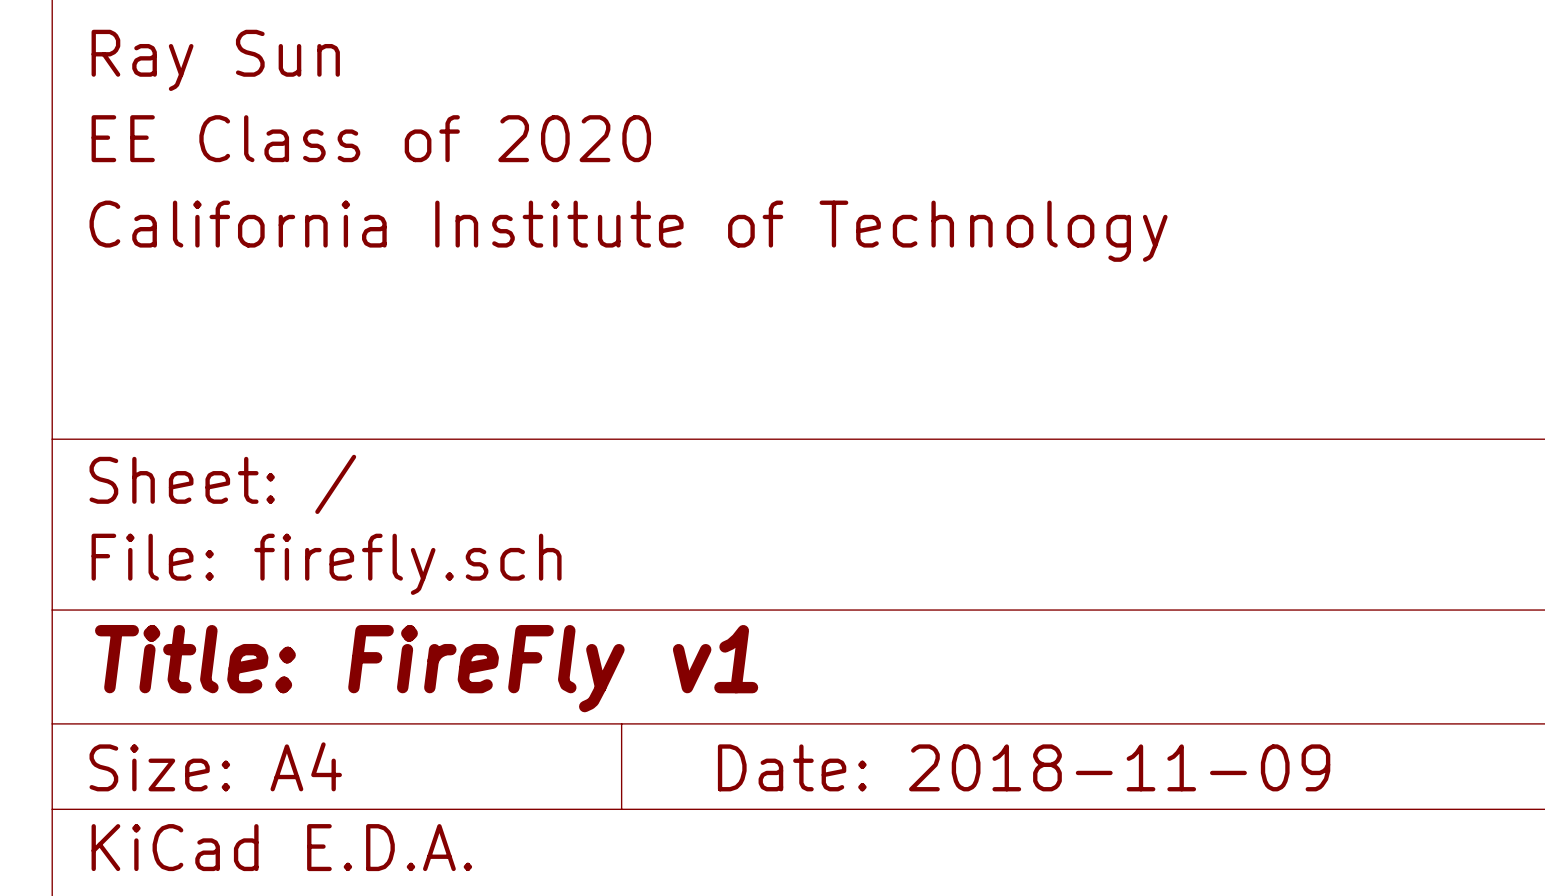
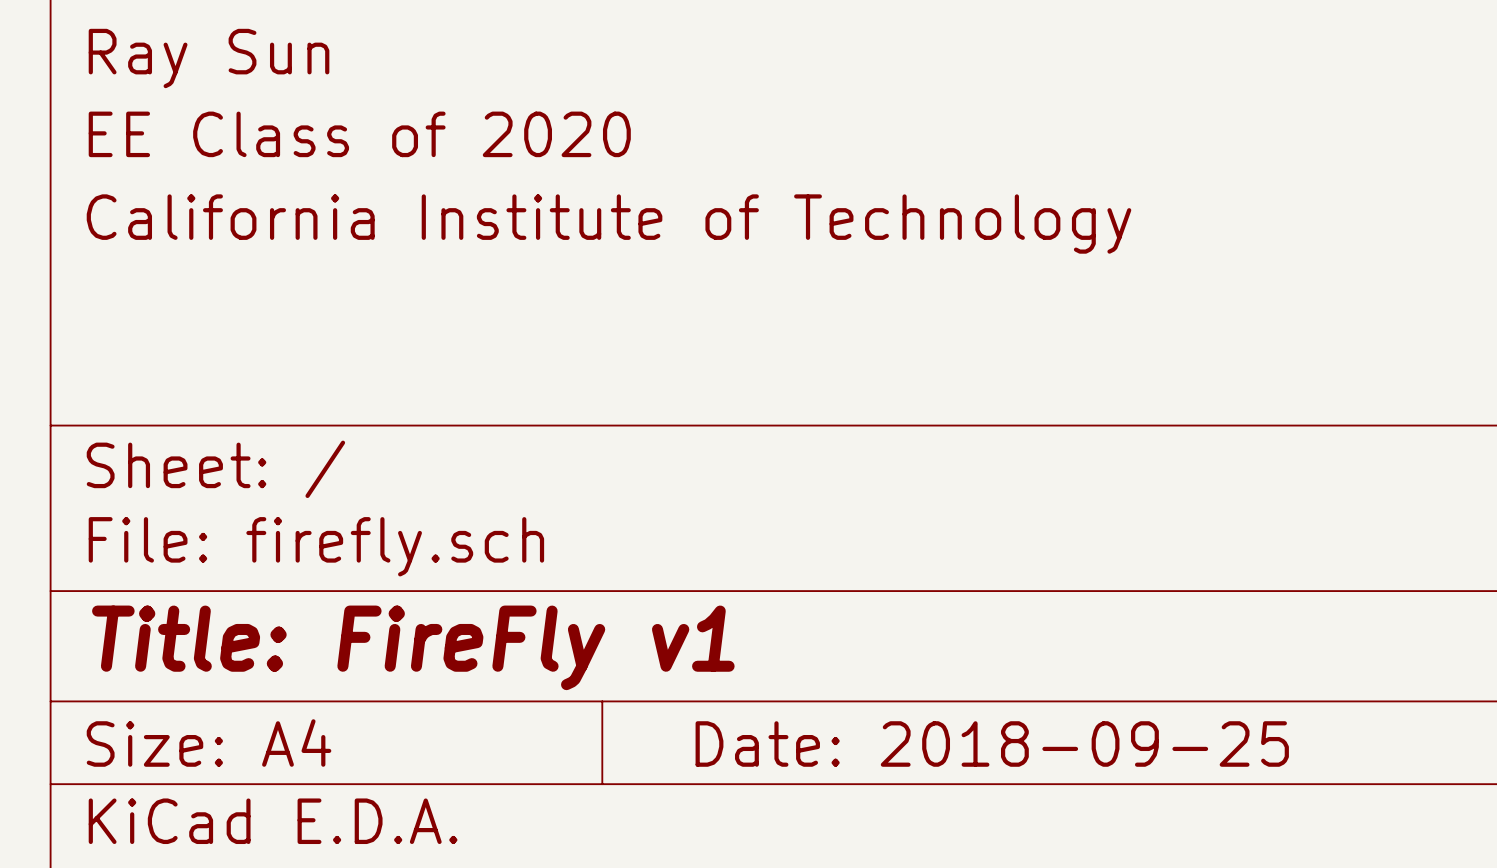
title block: Date: 2018-11-09 (1024, 767) -> Date: 2018-09-25 (992, 744)

